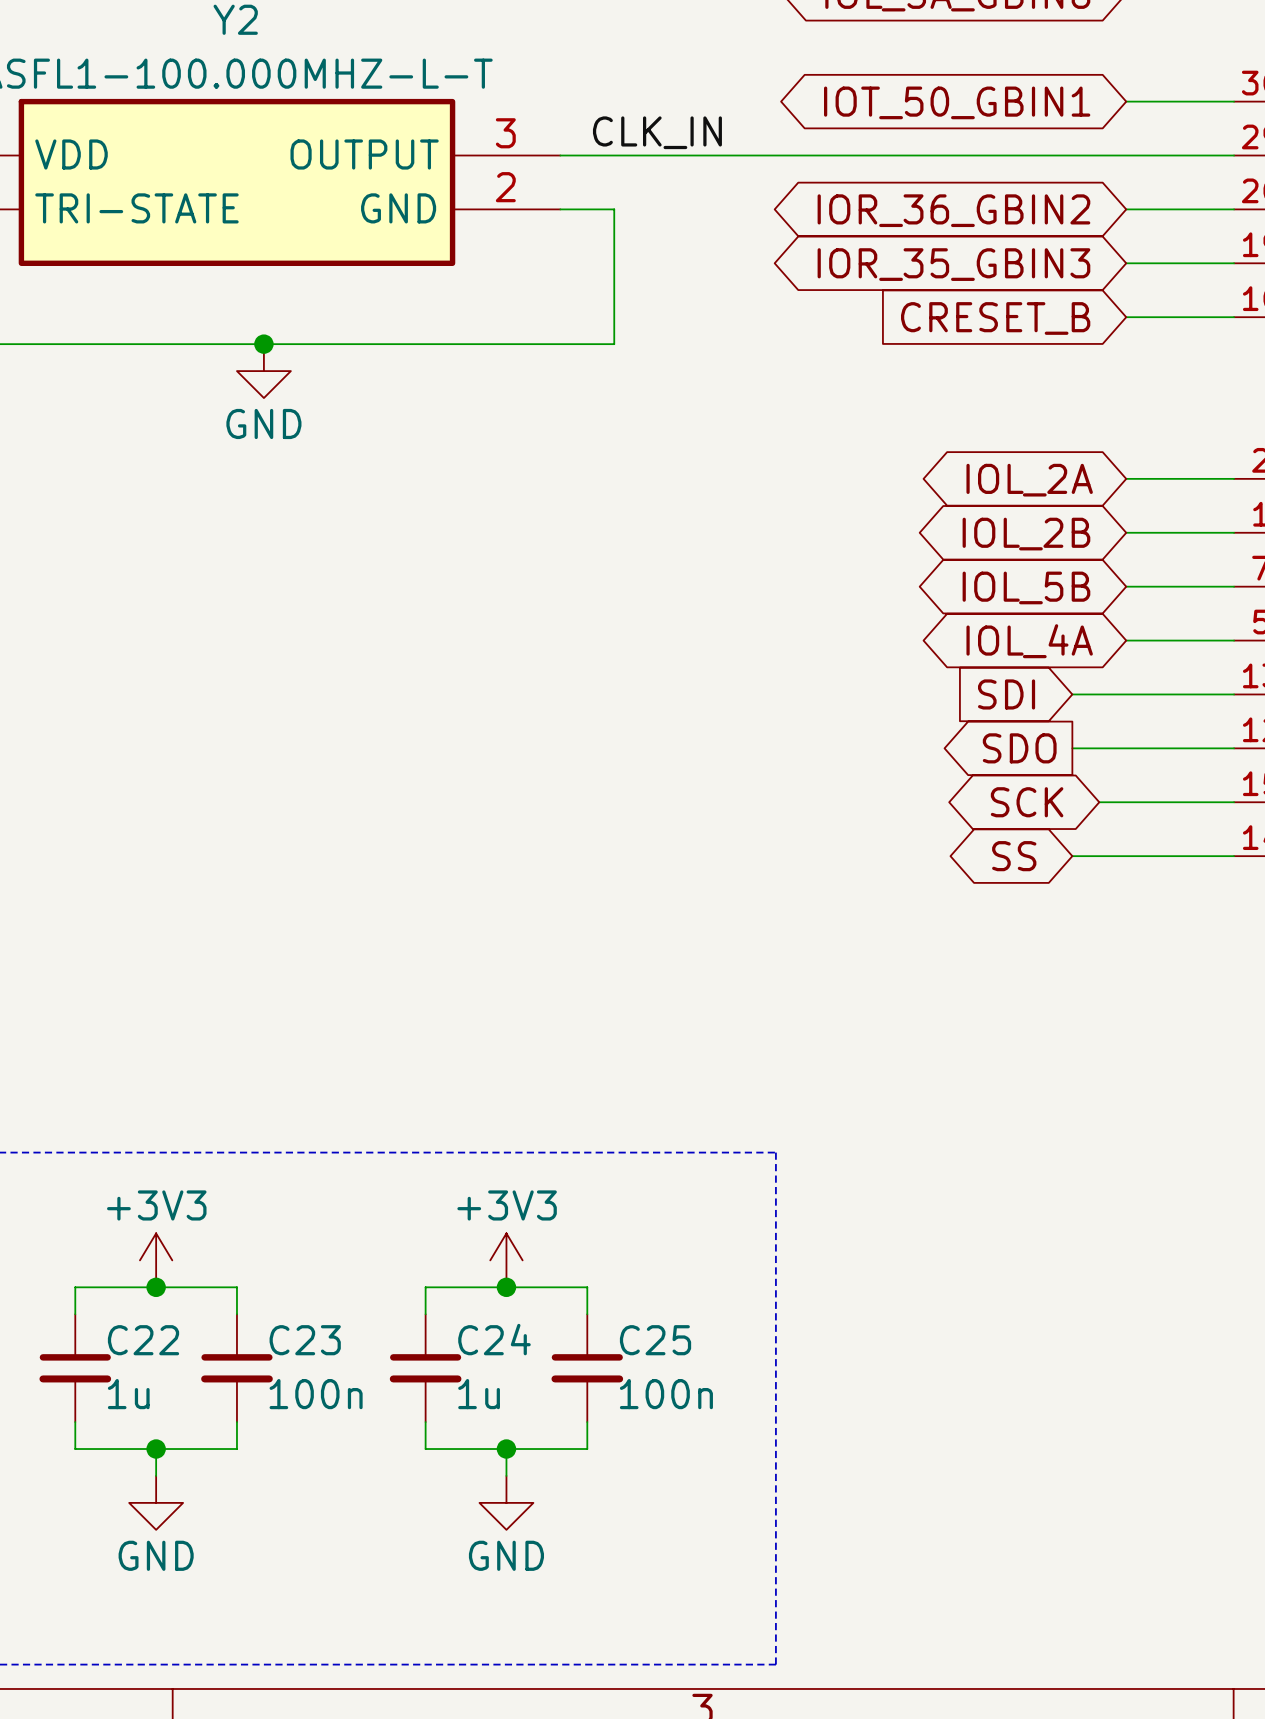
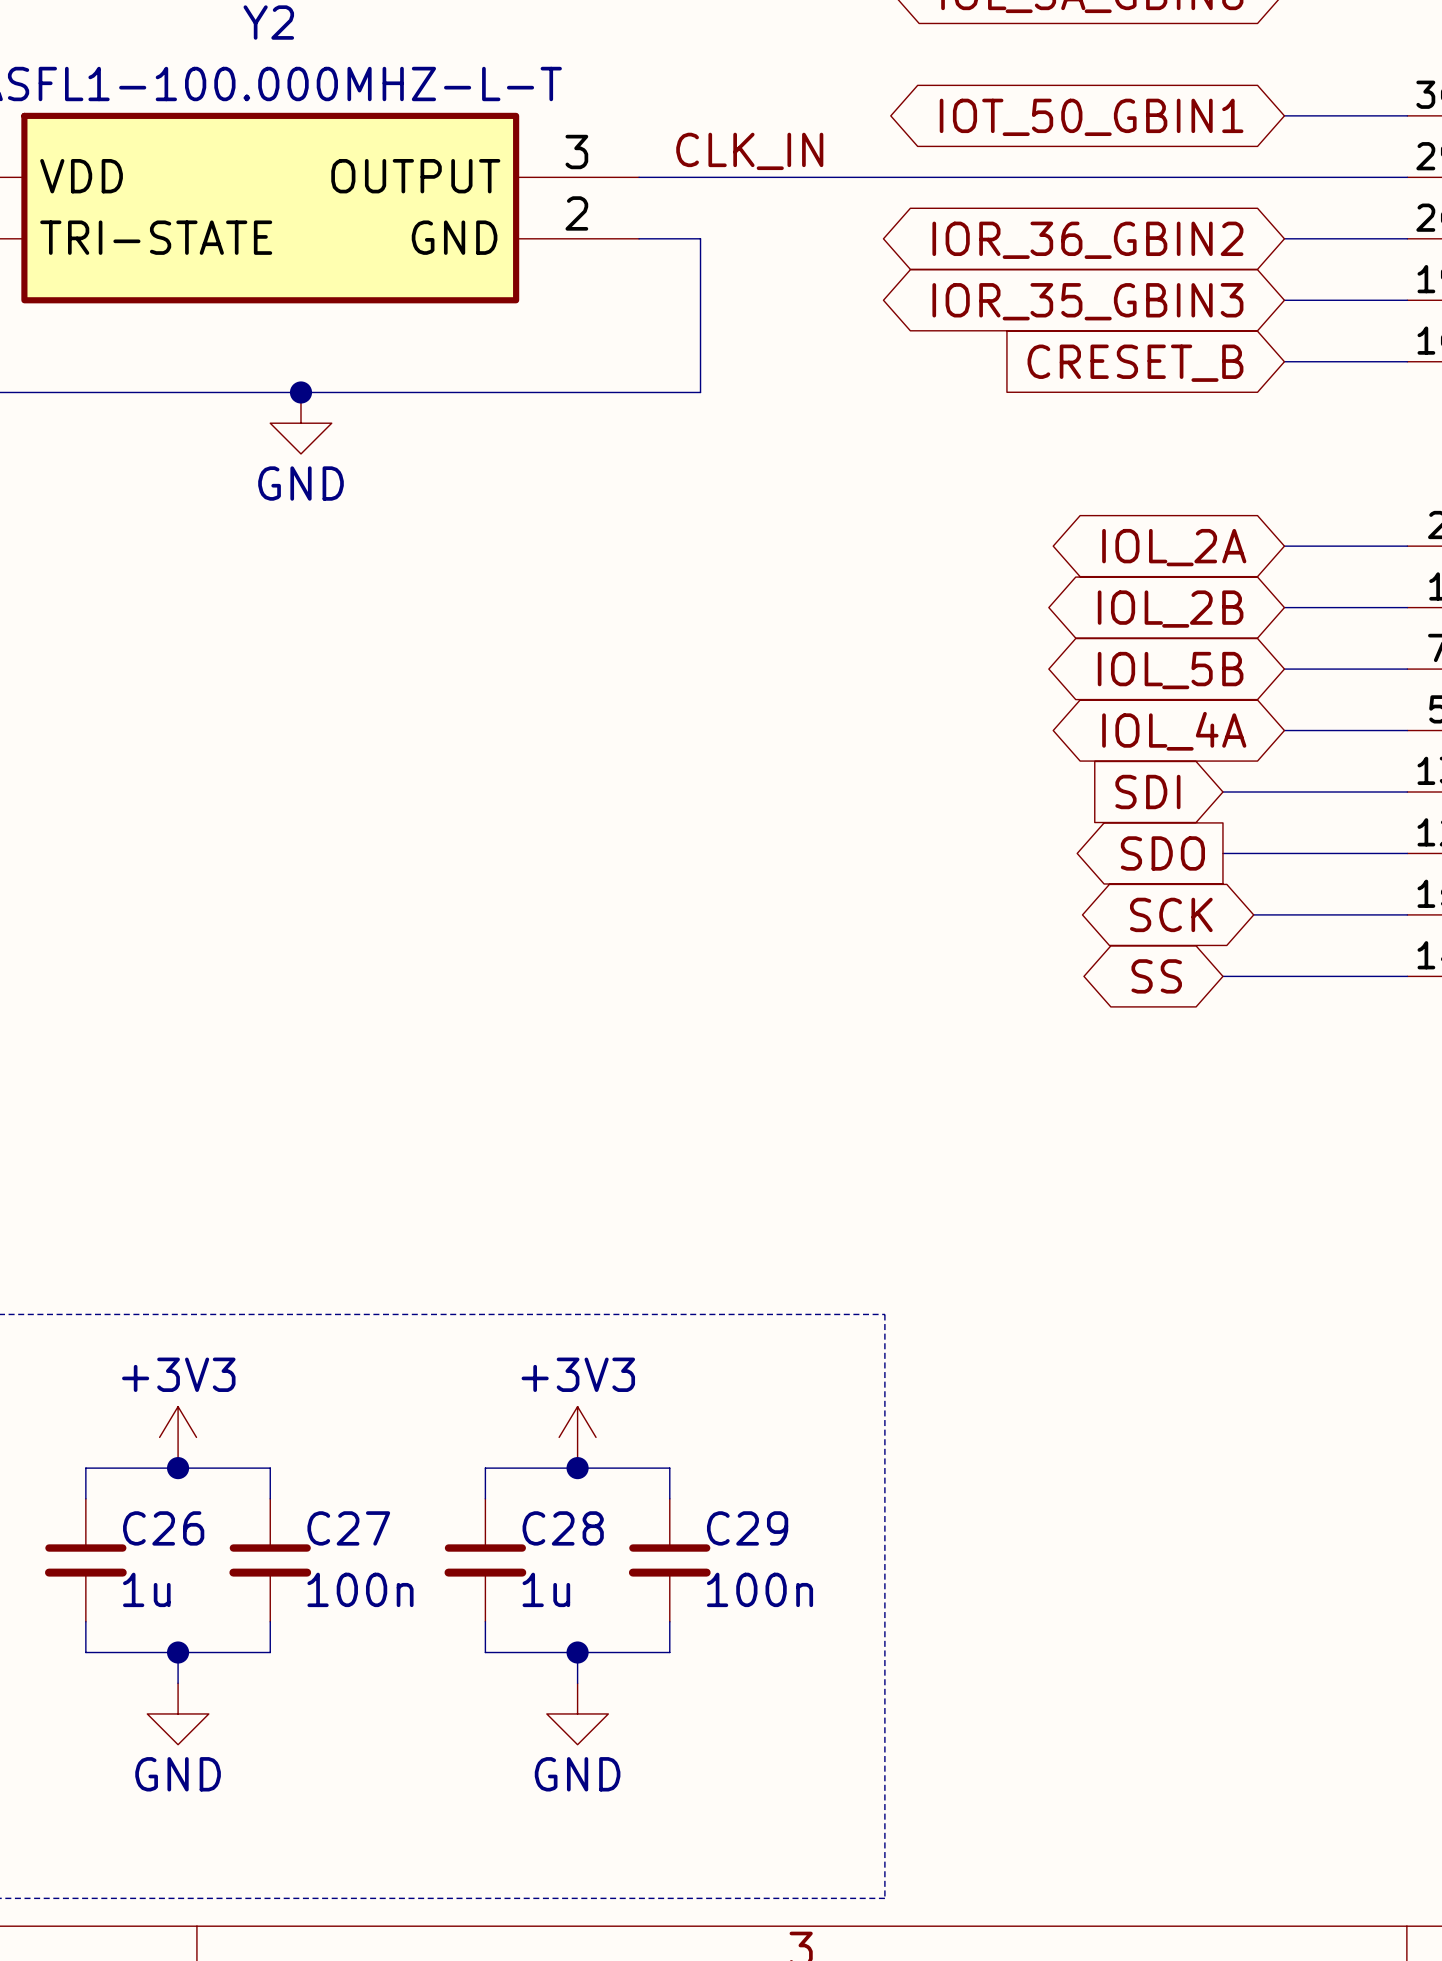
C24 name: C24 (494, 1339) -> C28 (563, 1528)
C22 name: C22 (143, 1340) -> C26 (163, 1528)
C23 name: C23 (305, 1340) -> C27 (348, 1528)
C25 name: C25 (655, 1340) -> C29 (747, 1528)

